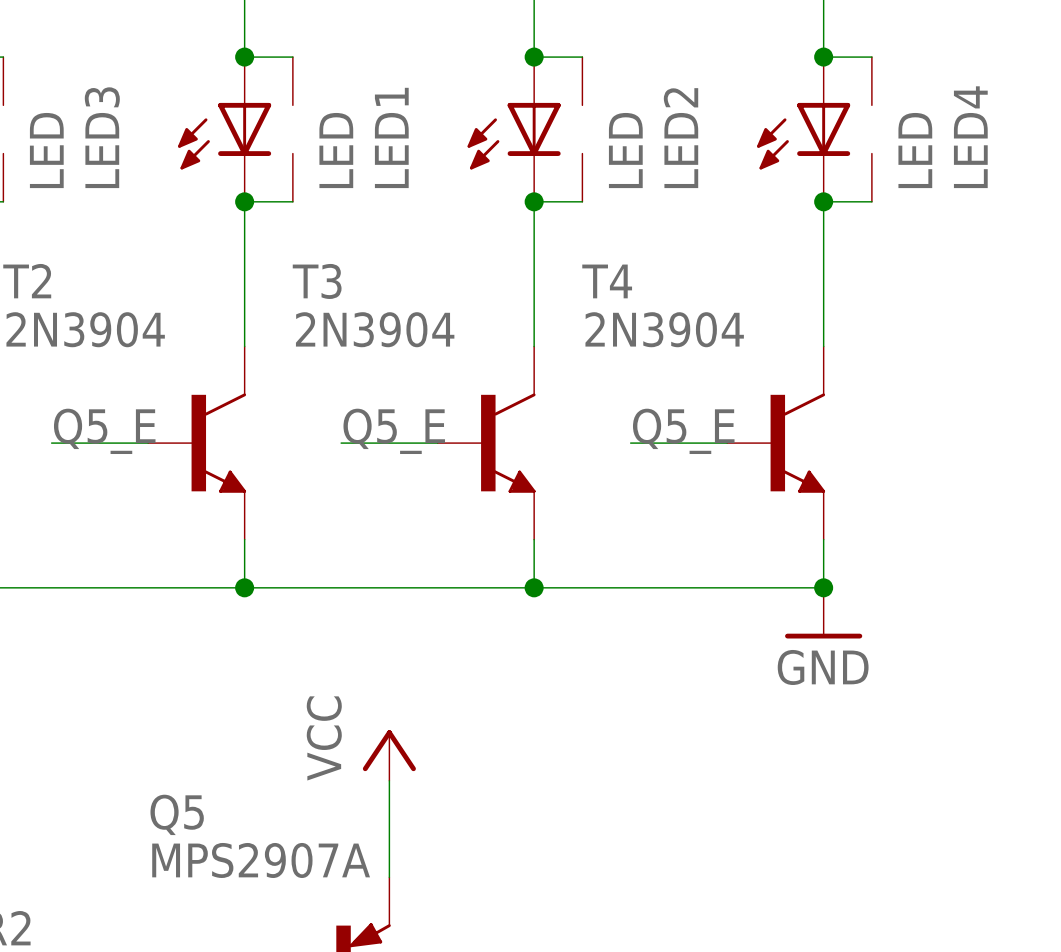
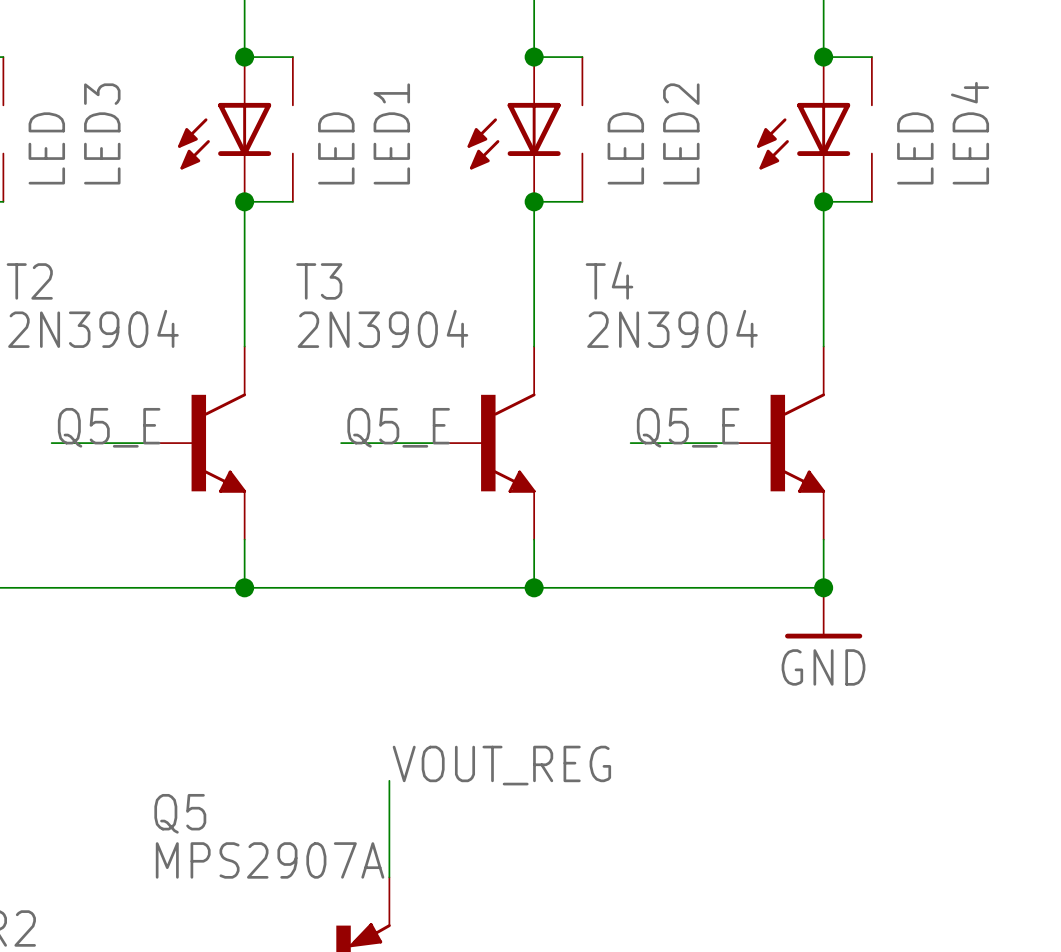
power symbol: VCC (389, 755) -> none
label: none -> VOUT_REG (501, 765)

